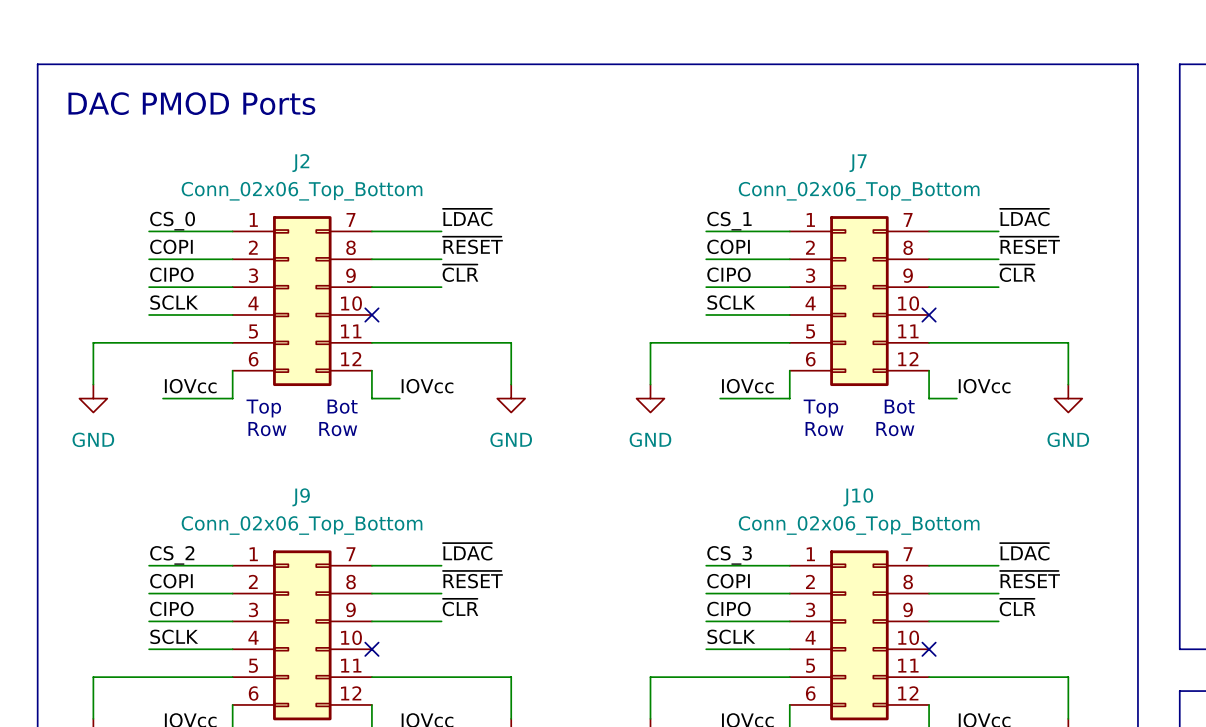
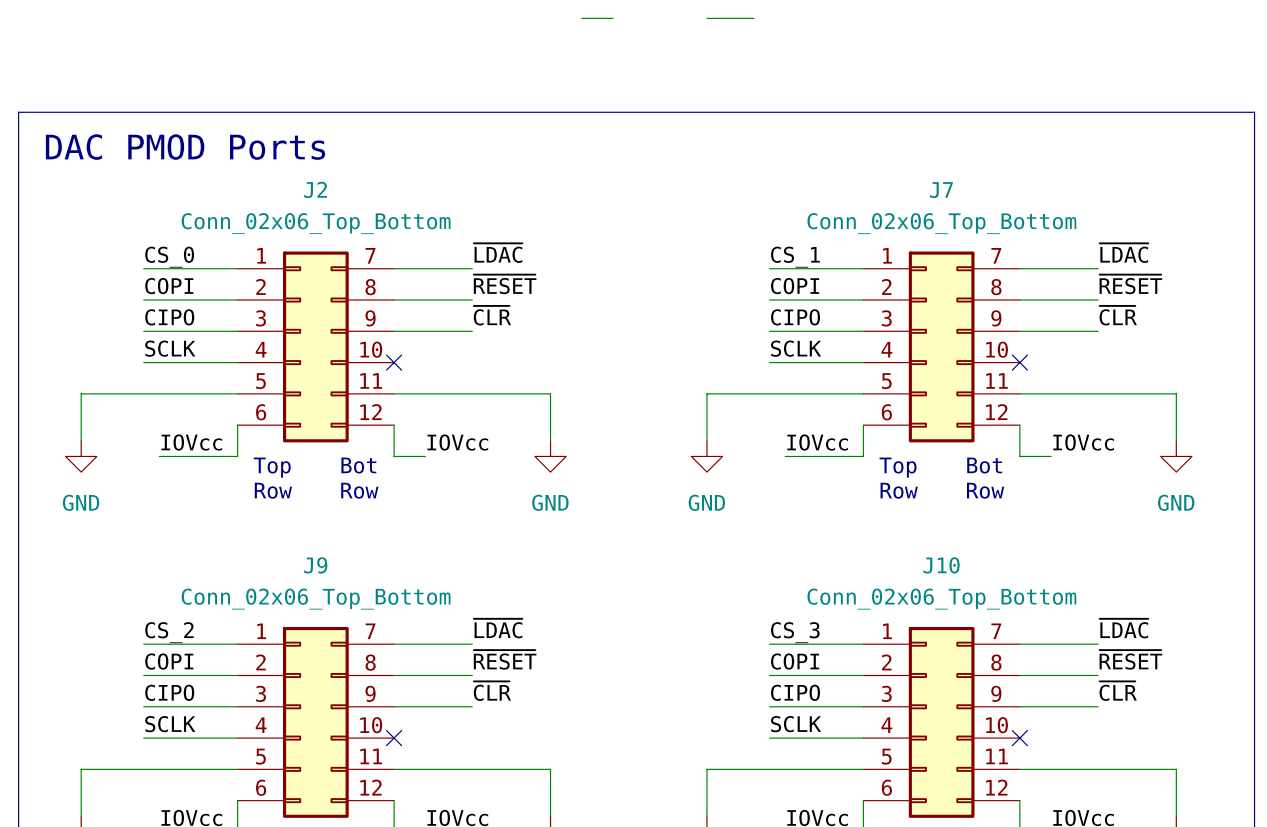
wire: none -> (581, 18) (613, 18)
wire: none -> (706, 18) (753, 18)
line: (37, 92) (37, 64) (1137, 64) (1137, 92) -> (18, 112) (1254, 112)
text position: DAC PMOD Ports (191, 103) -> DAC PMOD Ports (185, 147)

